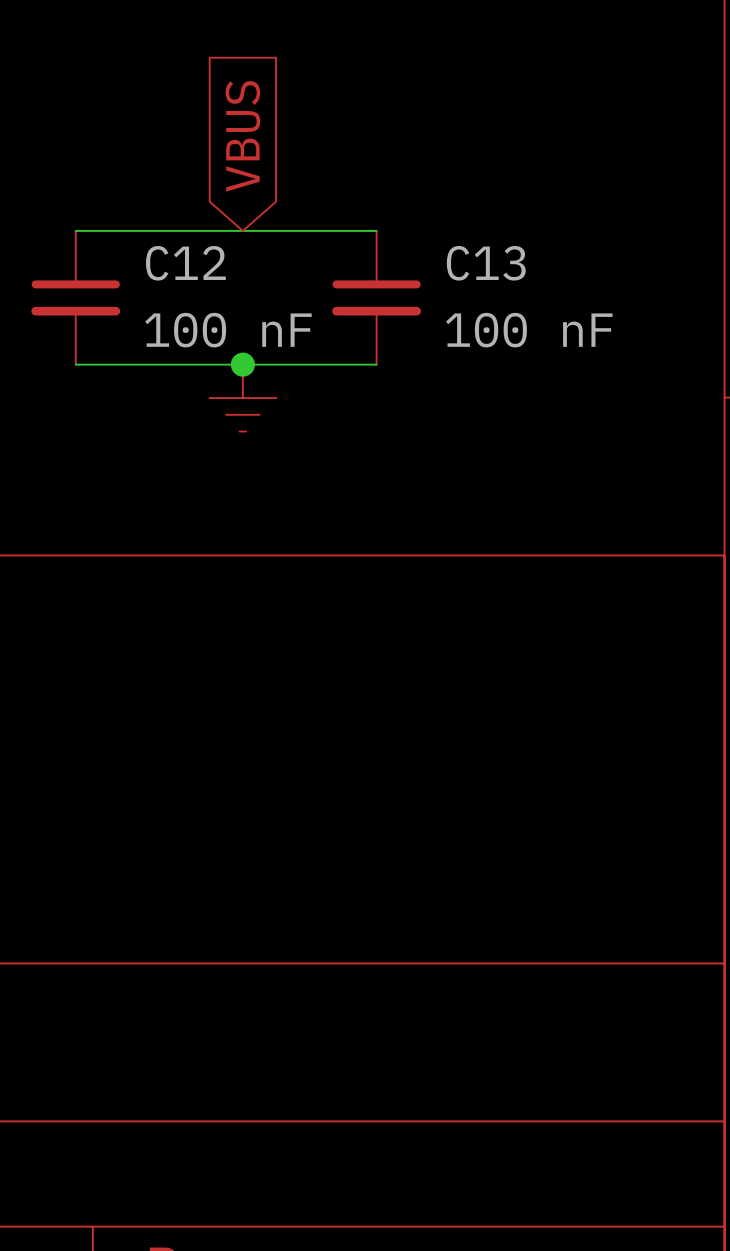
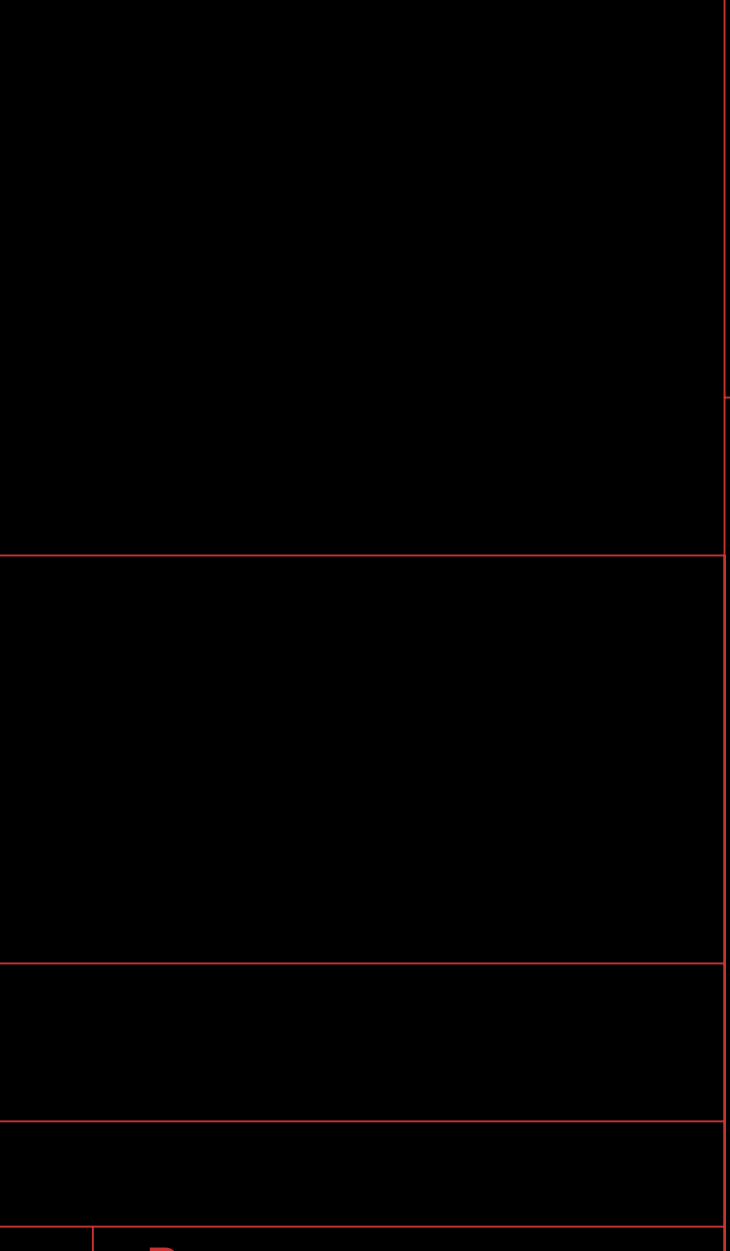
global label: VBUS (242, 136) -> none
wire: (75, 230) (376, 230) -> none
C12: 100 nF (75, 297) -> none
C13: 100 nF (376, 297) -> none
wire: (75, 364) (376, 364) -> none
junction: (242, 364) -> none
power symbol: (242, 398) -> none

